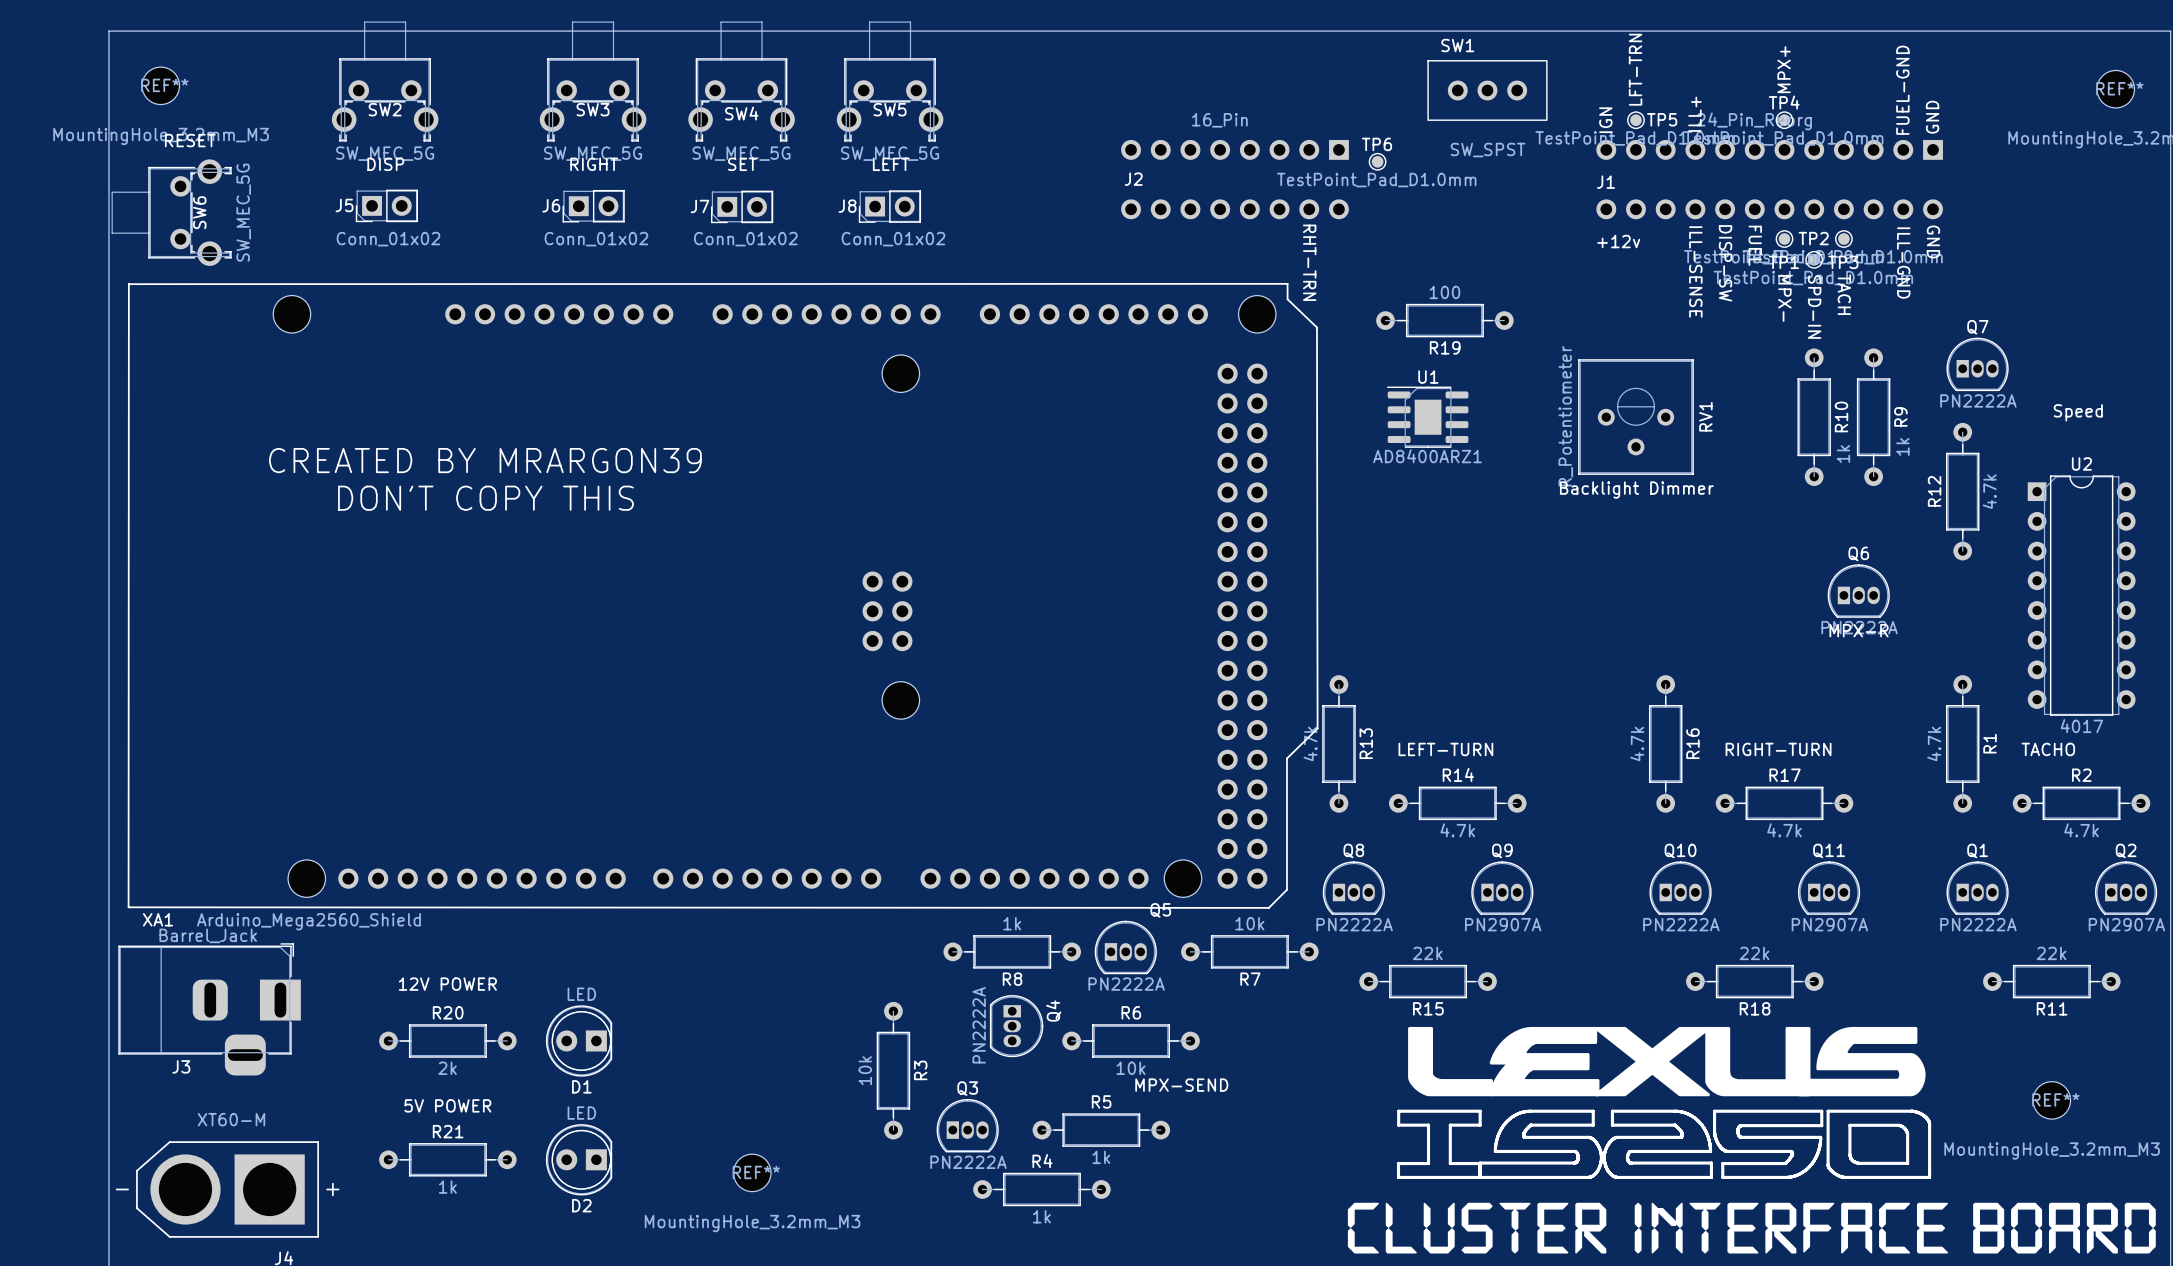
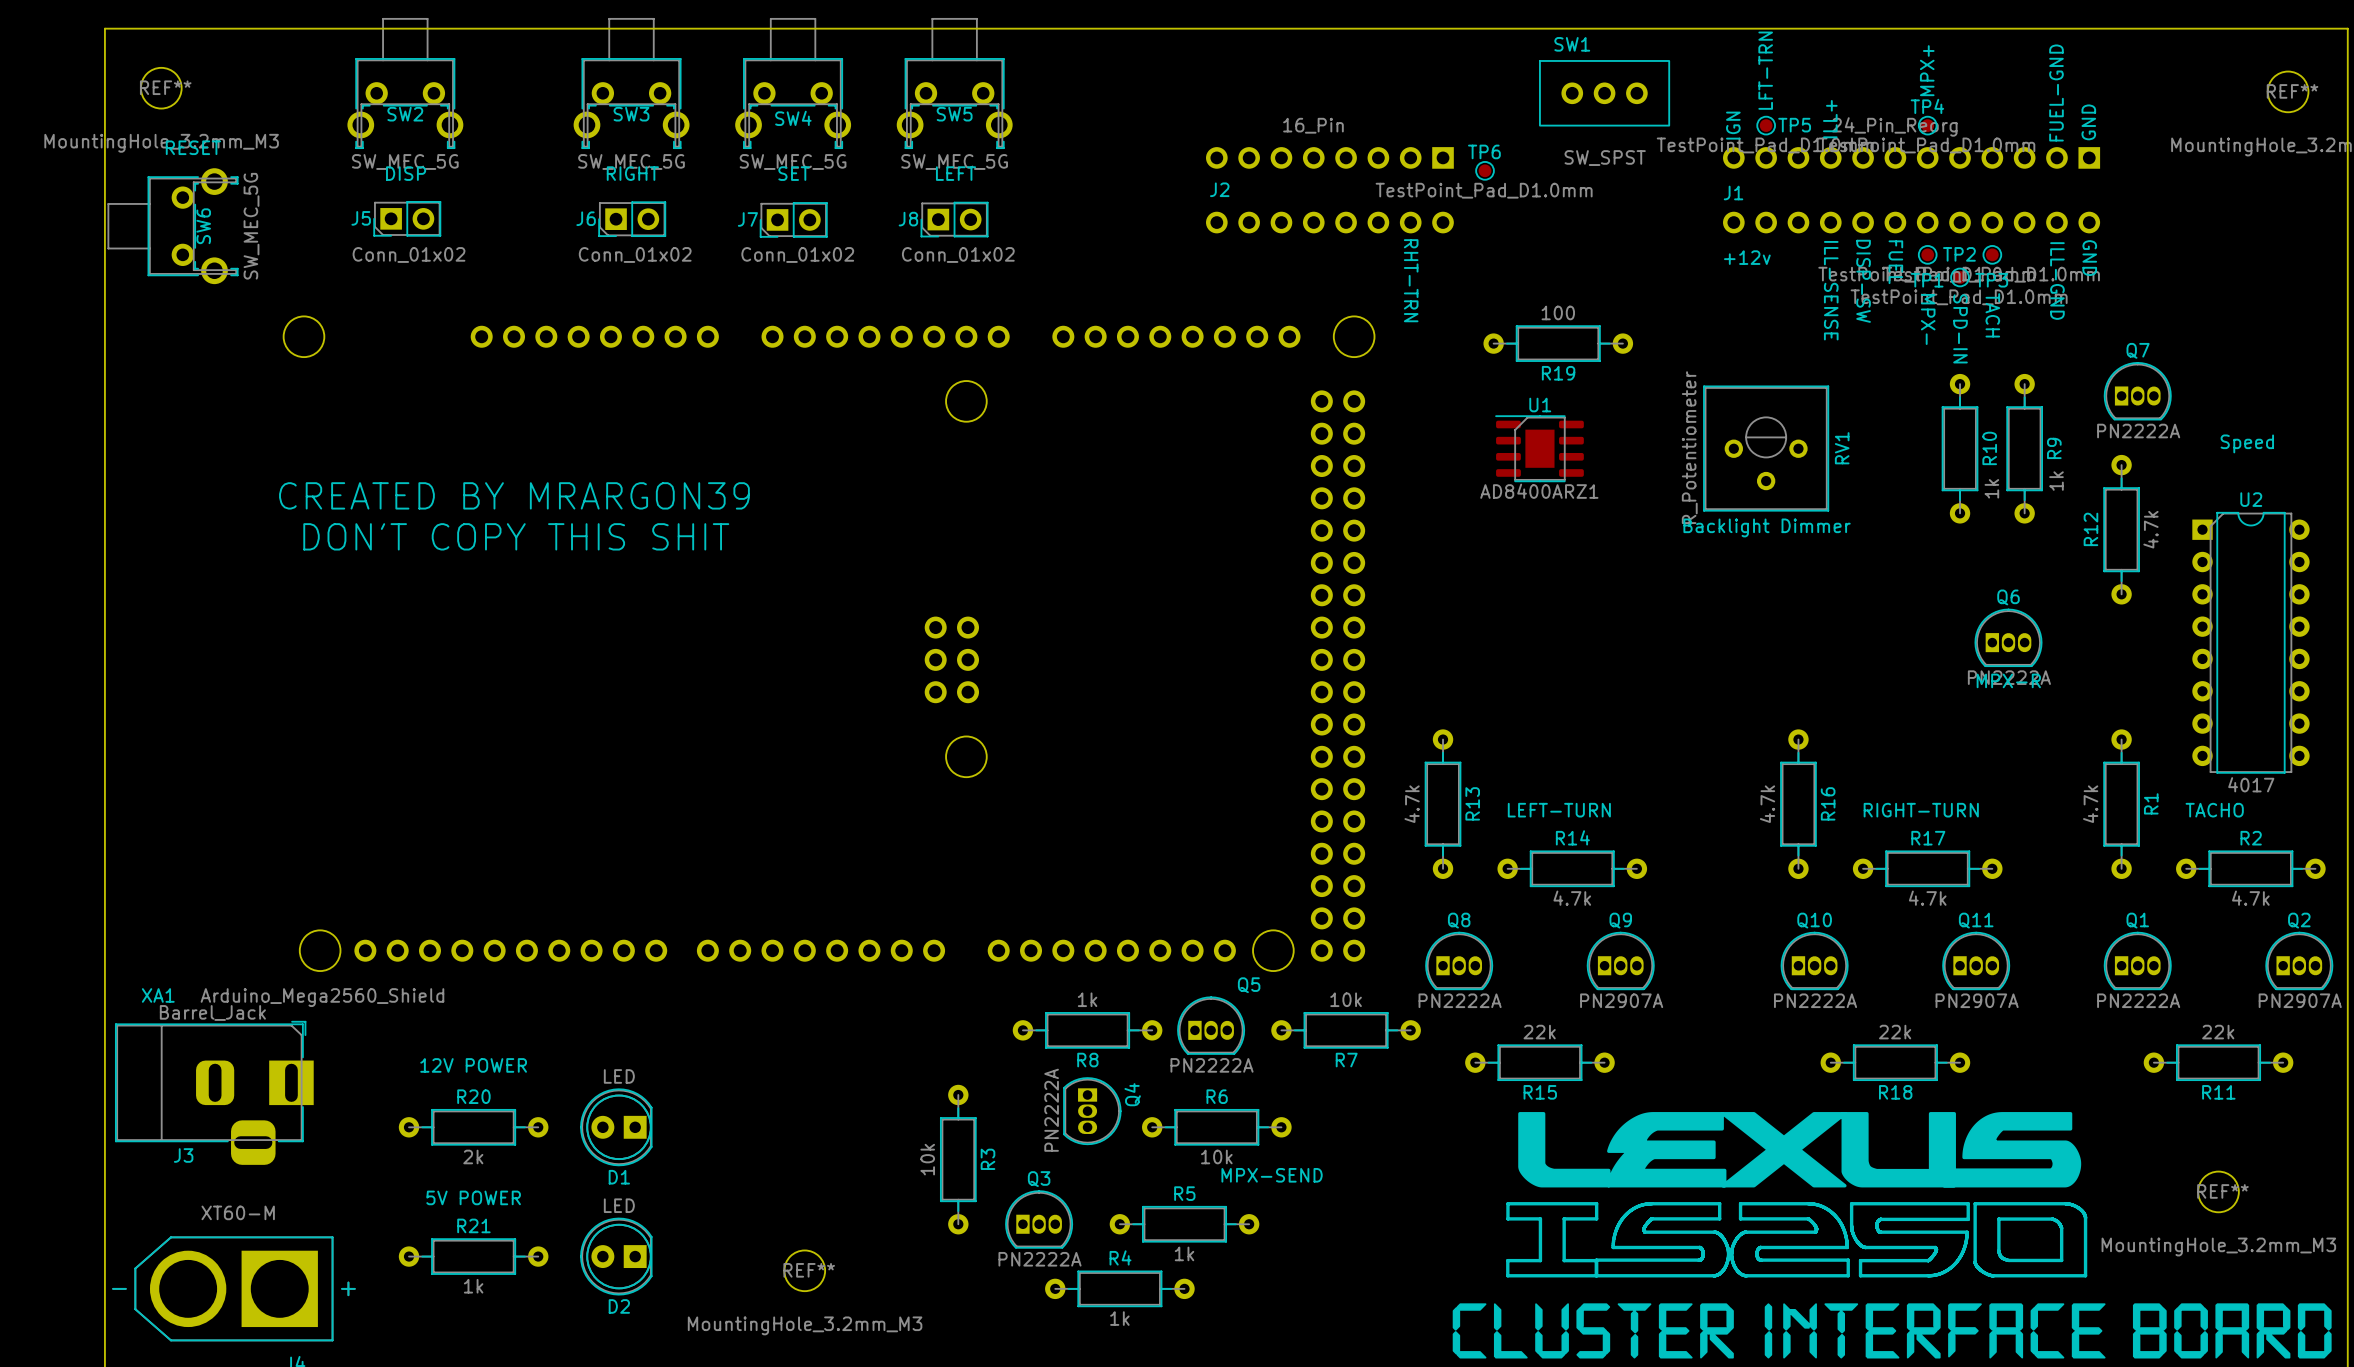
line: (1287, 283) (128, 284) (128, 907) (1268, 907) (1286, 889) (1286, 758) (1317, 728) (1316, 327) (1287, 299) (1287, 283) -> none
text: DON'T COPY THIS (485, 498) -> DON'T COPY THIS SHIT (516, 536)

